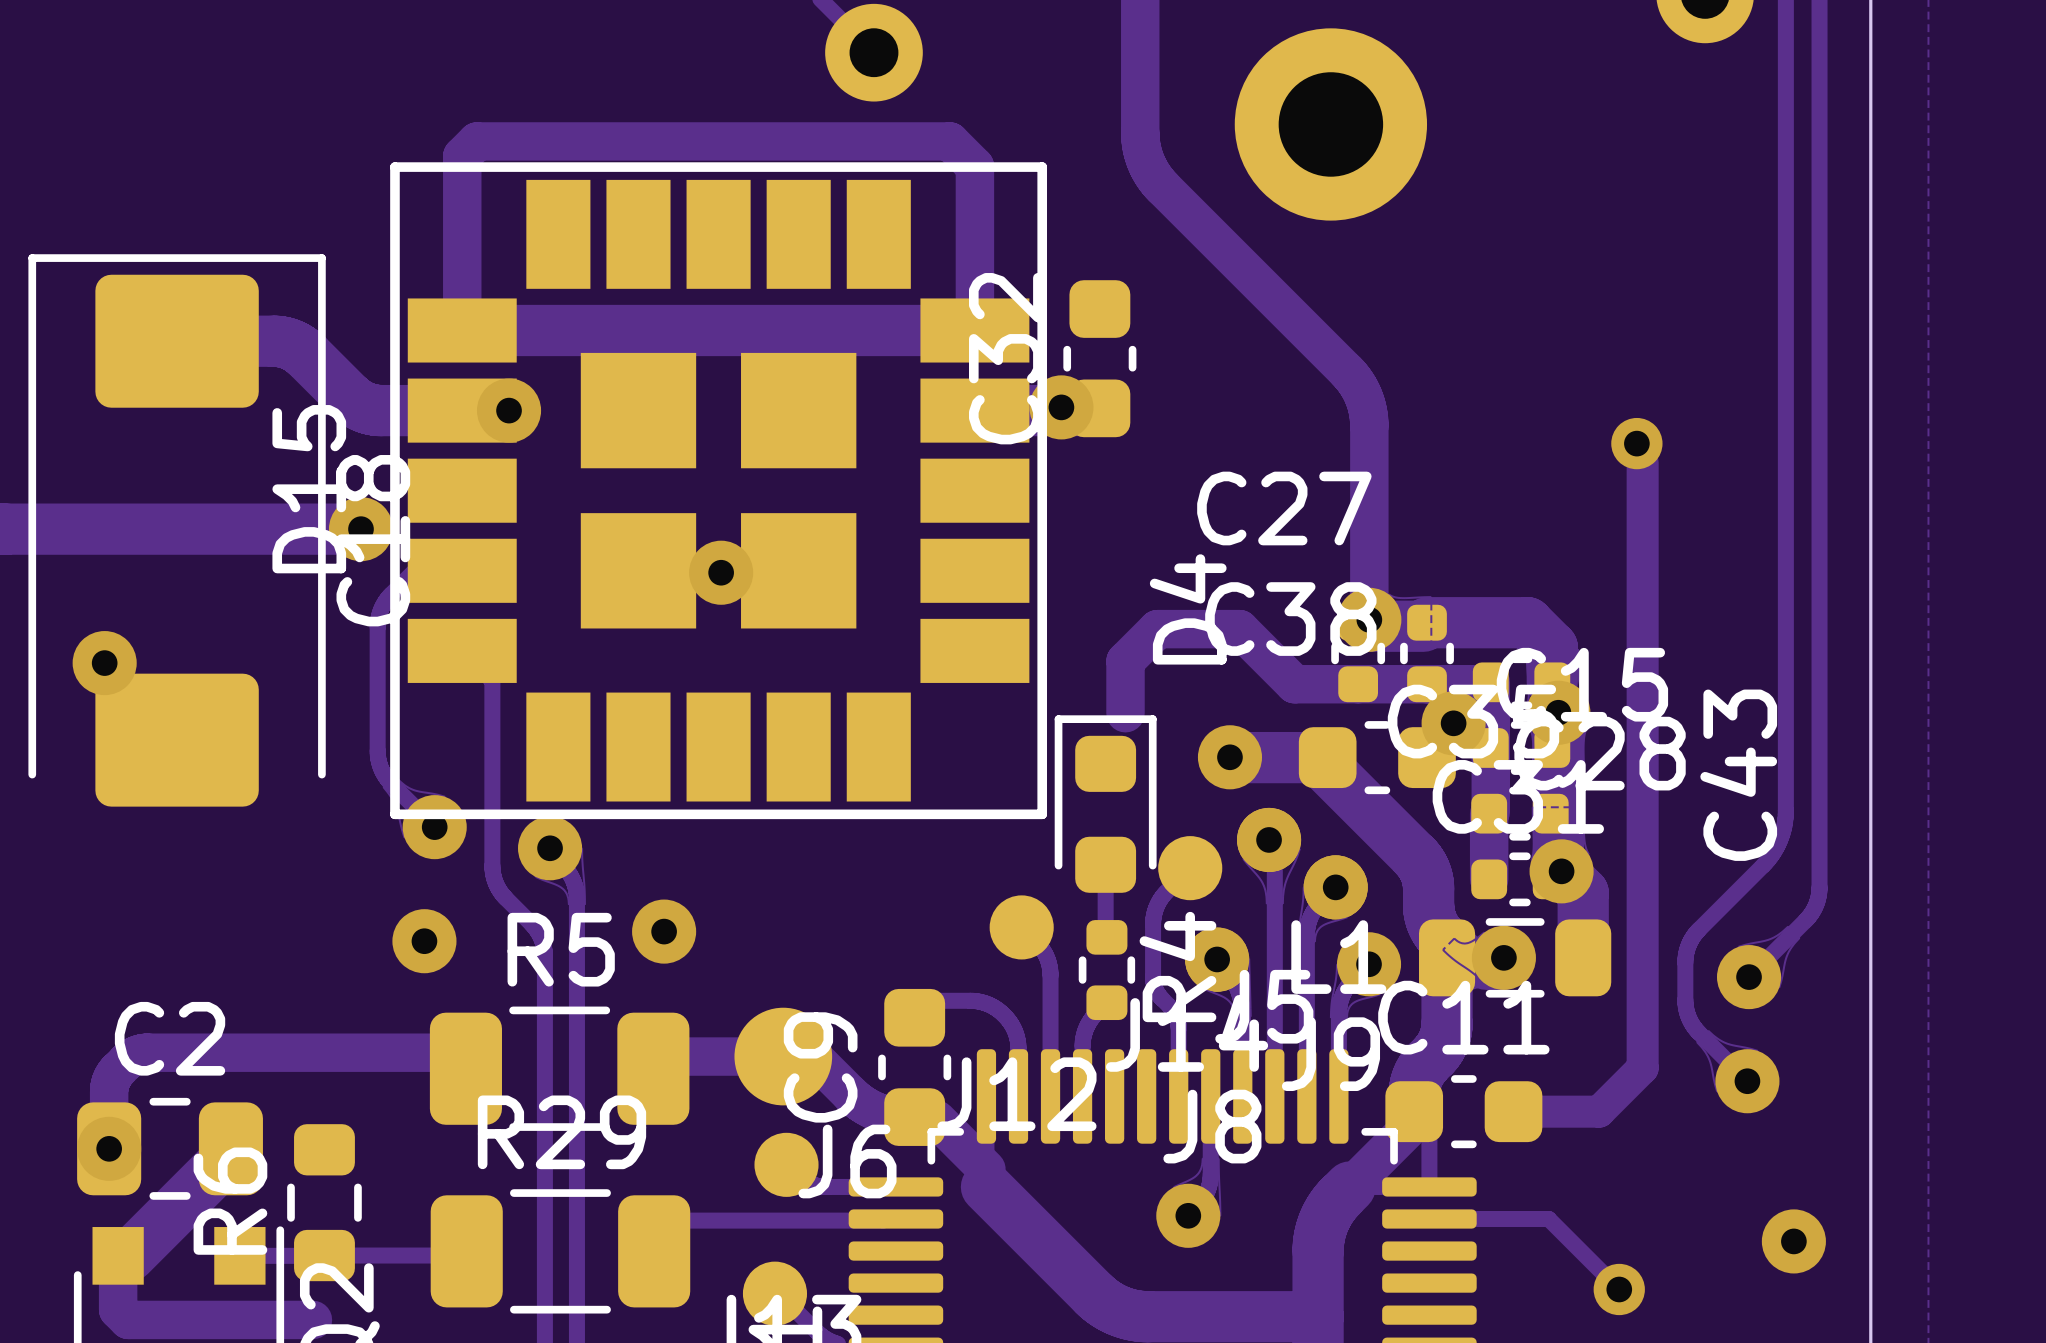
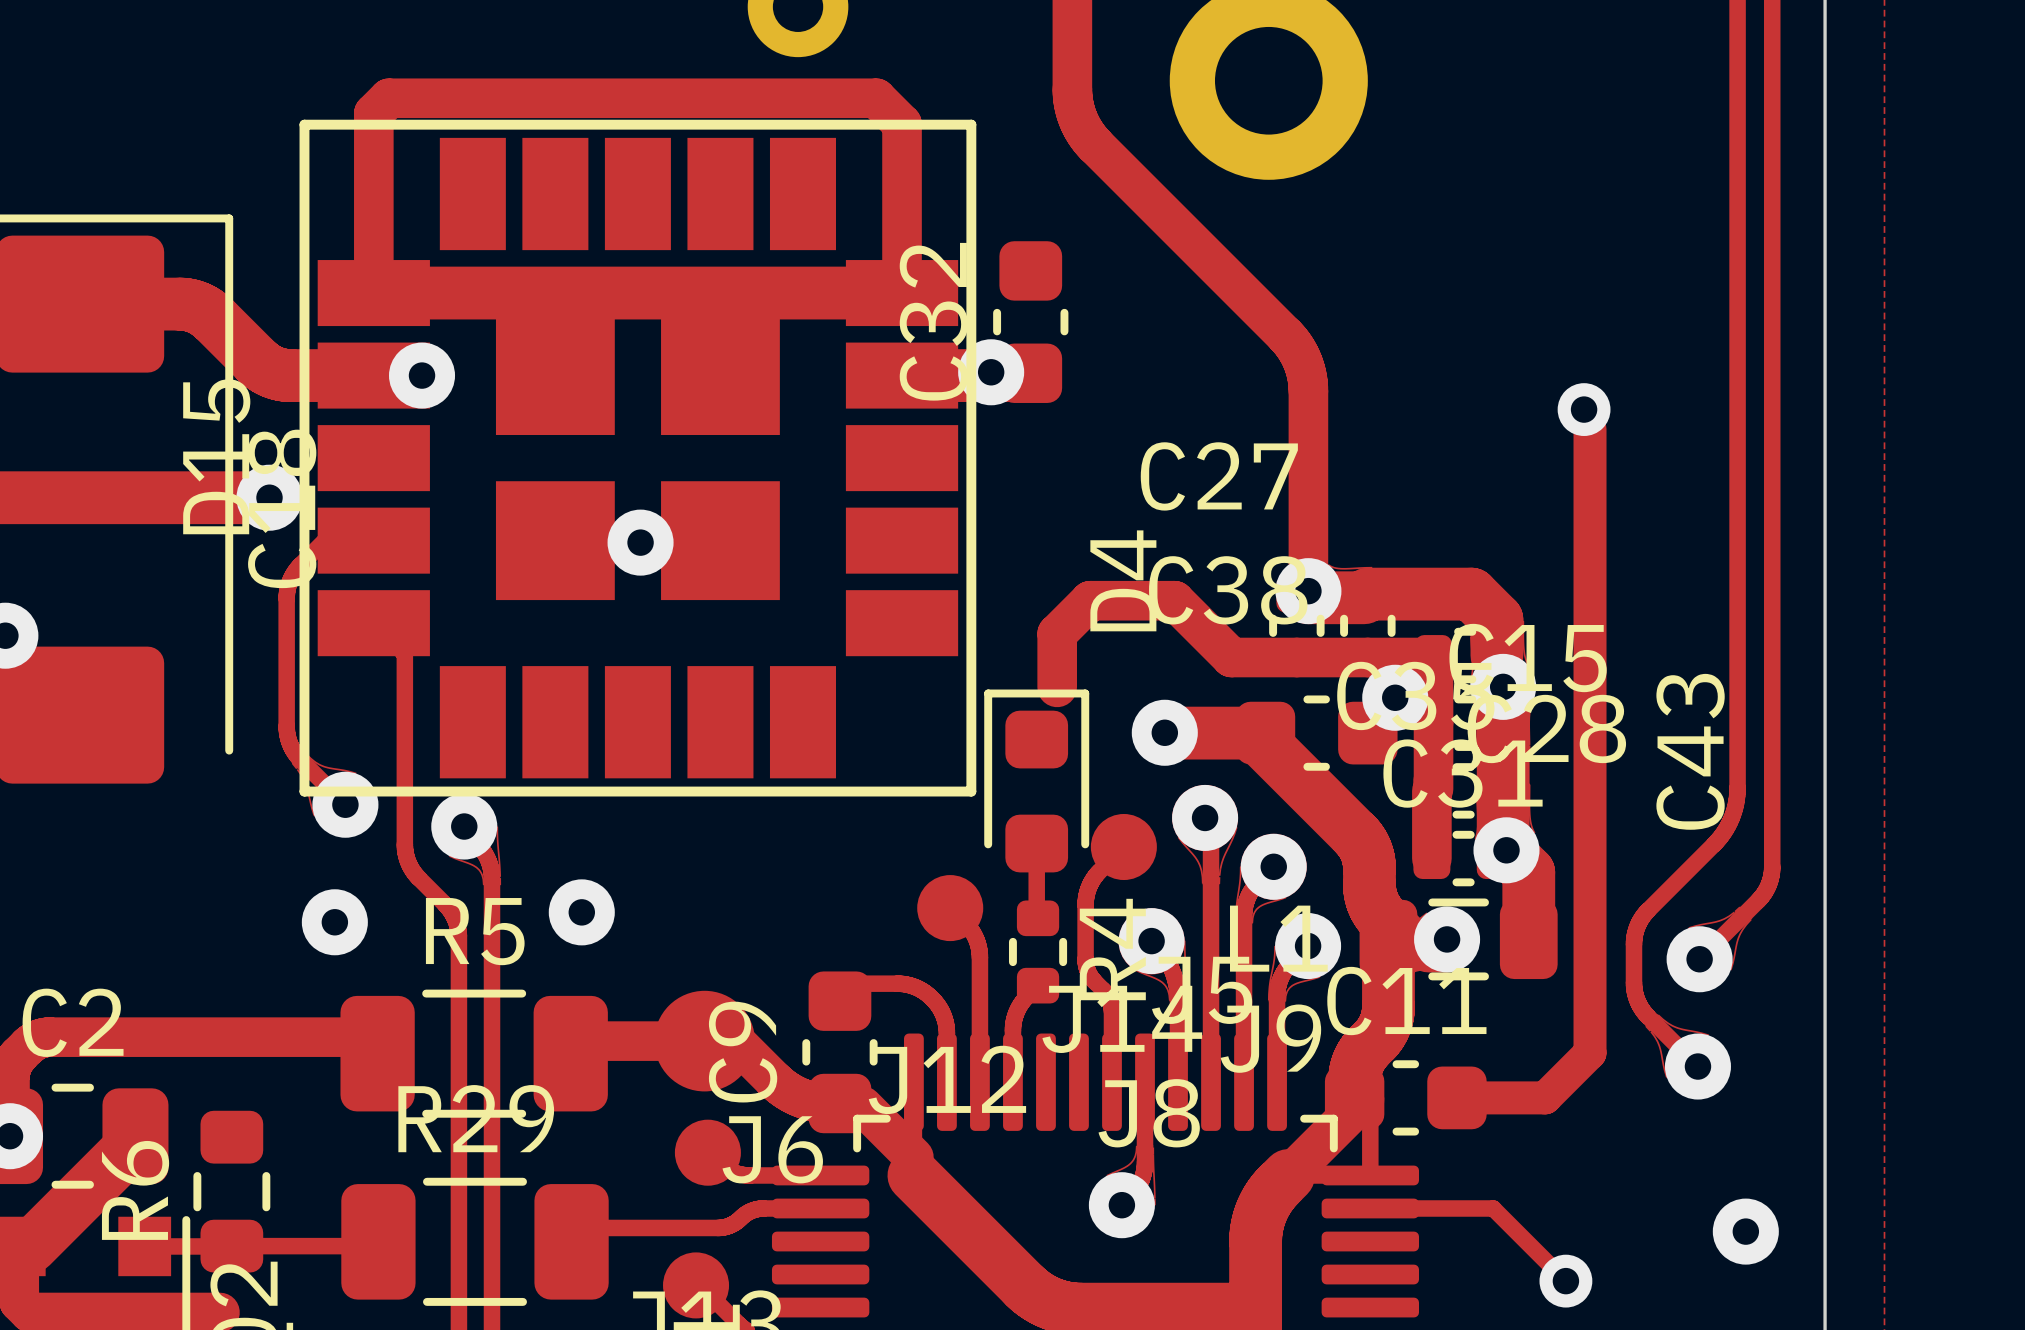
track: (884, 1219) (883, 1220) (684, 1220) (667, 1237) -> (809, 1208) (757, 1209) (747, 1213) (732, 1224) (720, 1227) (585, 1227)

